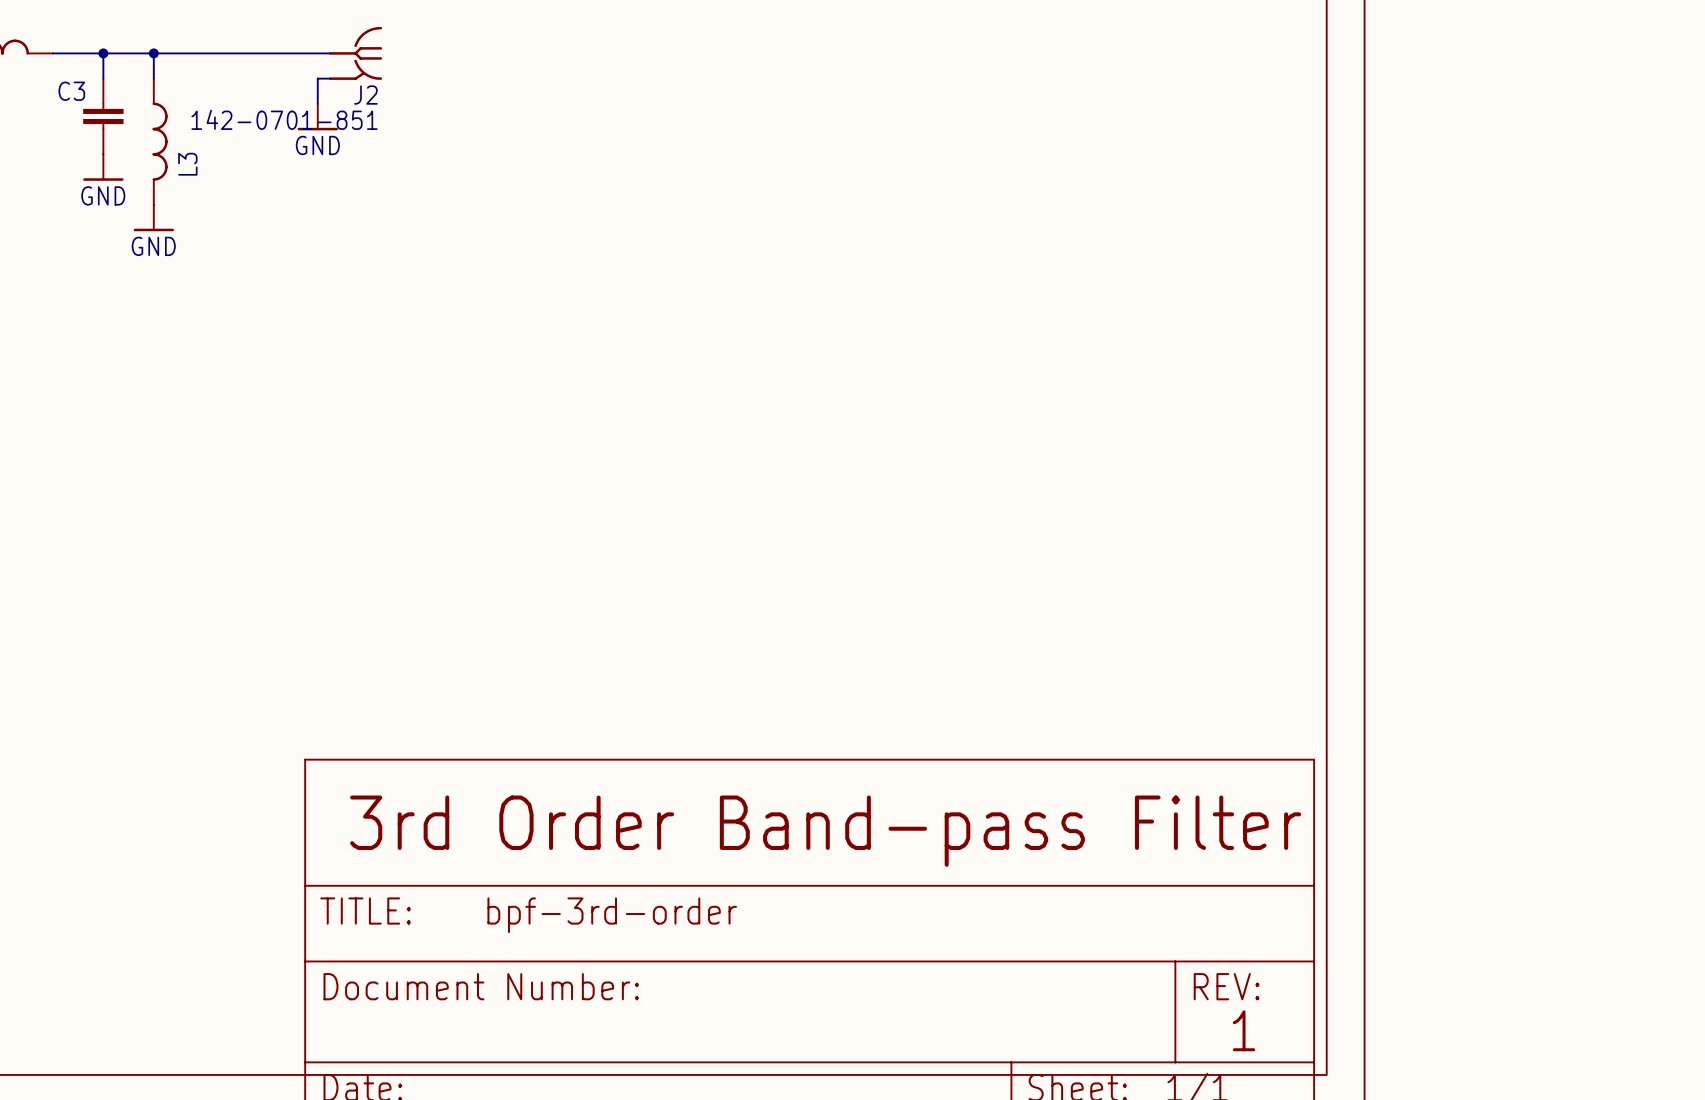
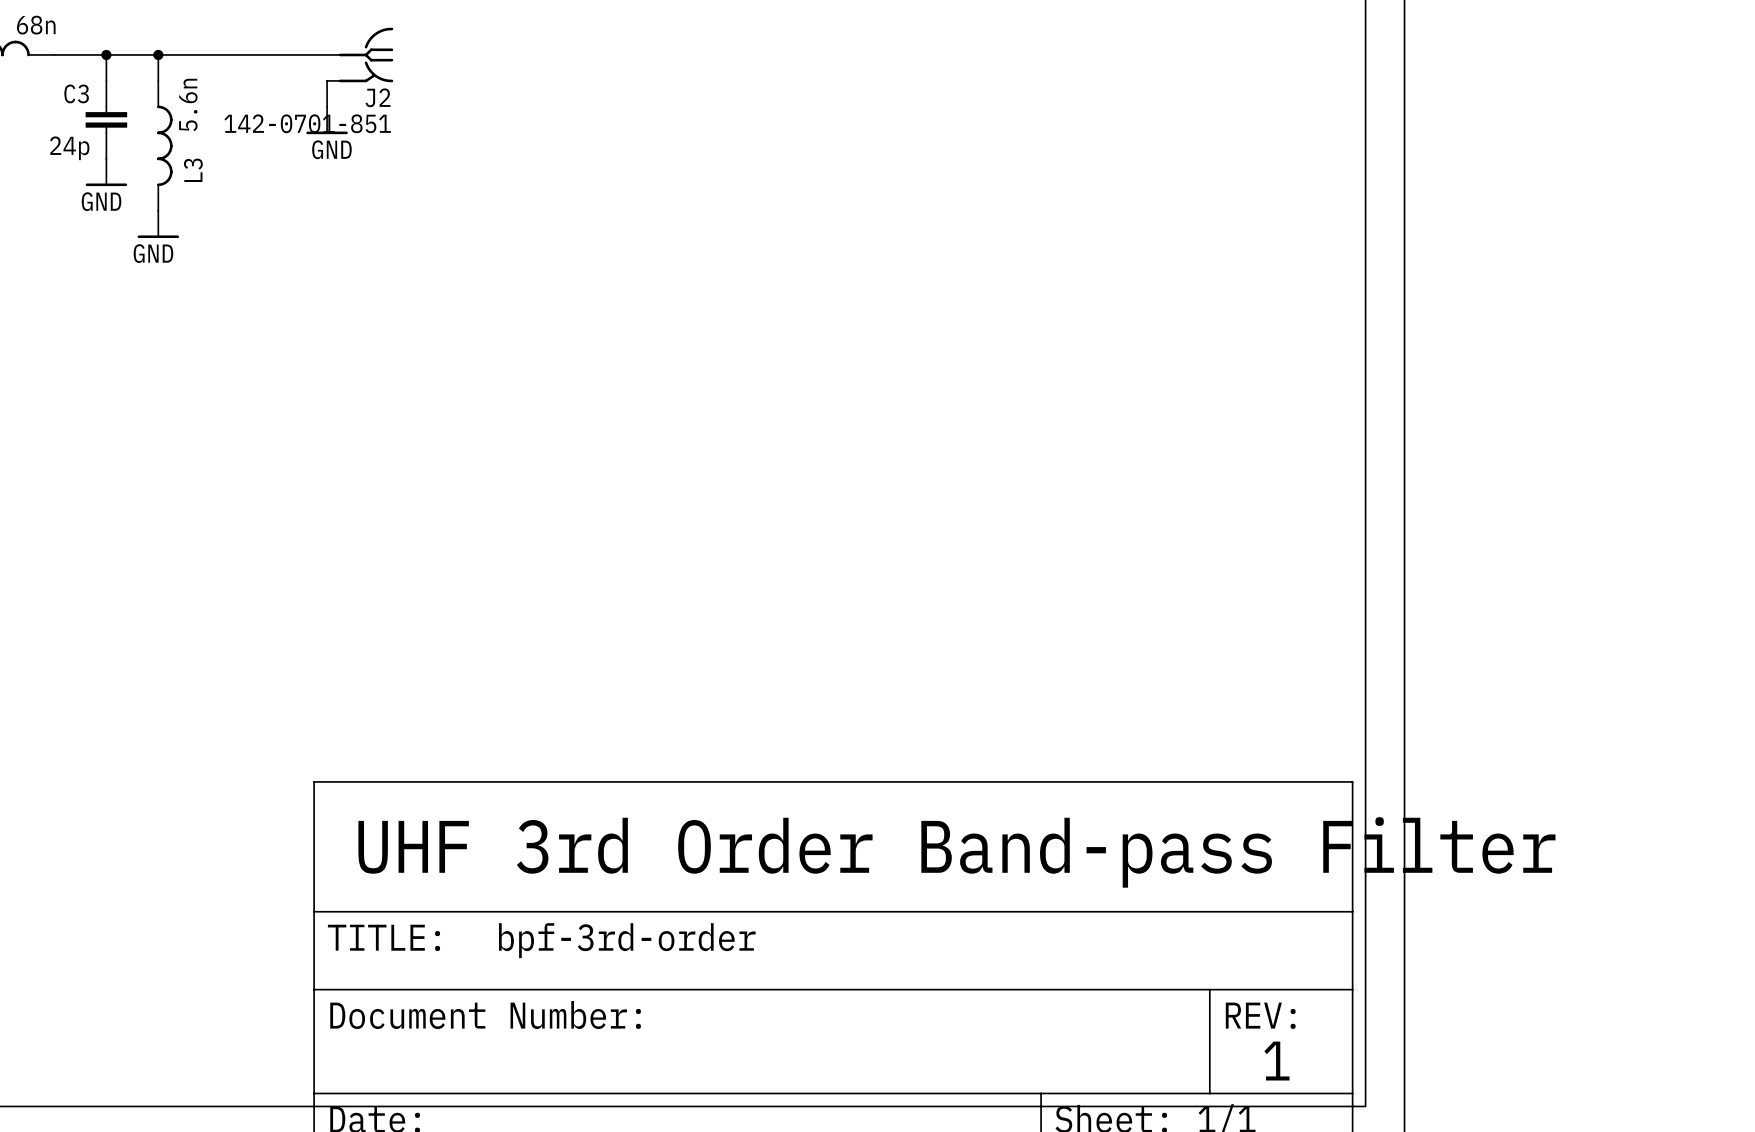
part value: none -> 68n (36, 25)
L3 value: none -> 5.6n (188, 104)
C3 value: none -> 24p (69, 148)
text: 3rd Order Band-pass Filter (825, 831) -> UHF 3rd Order Band-pass Filter (956, 852)

